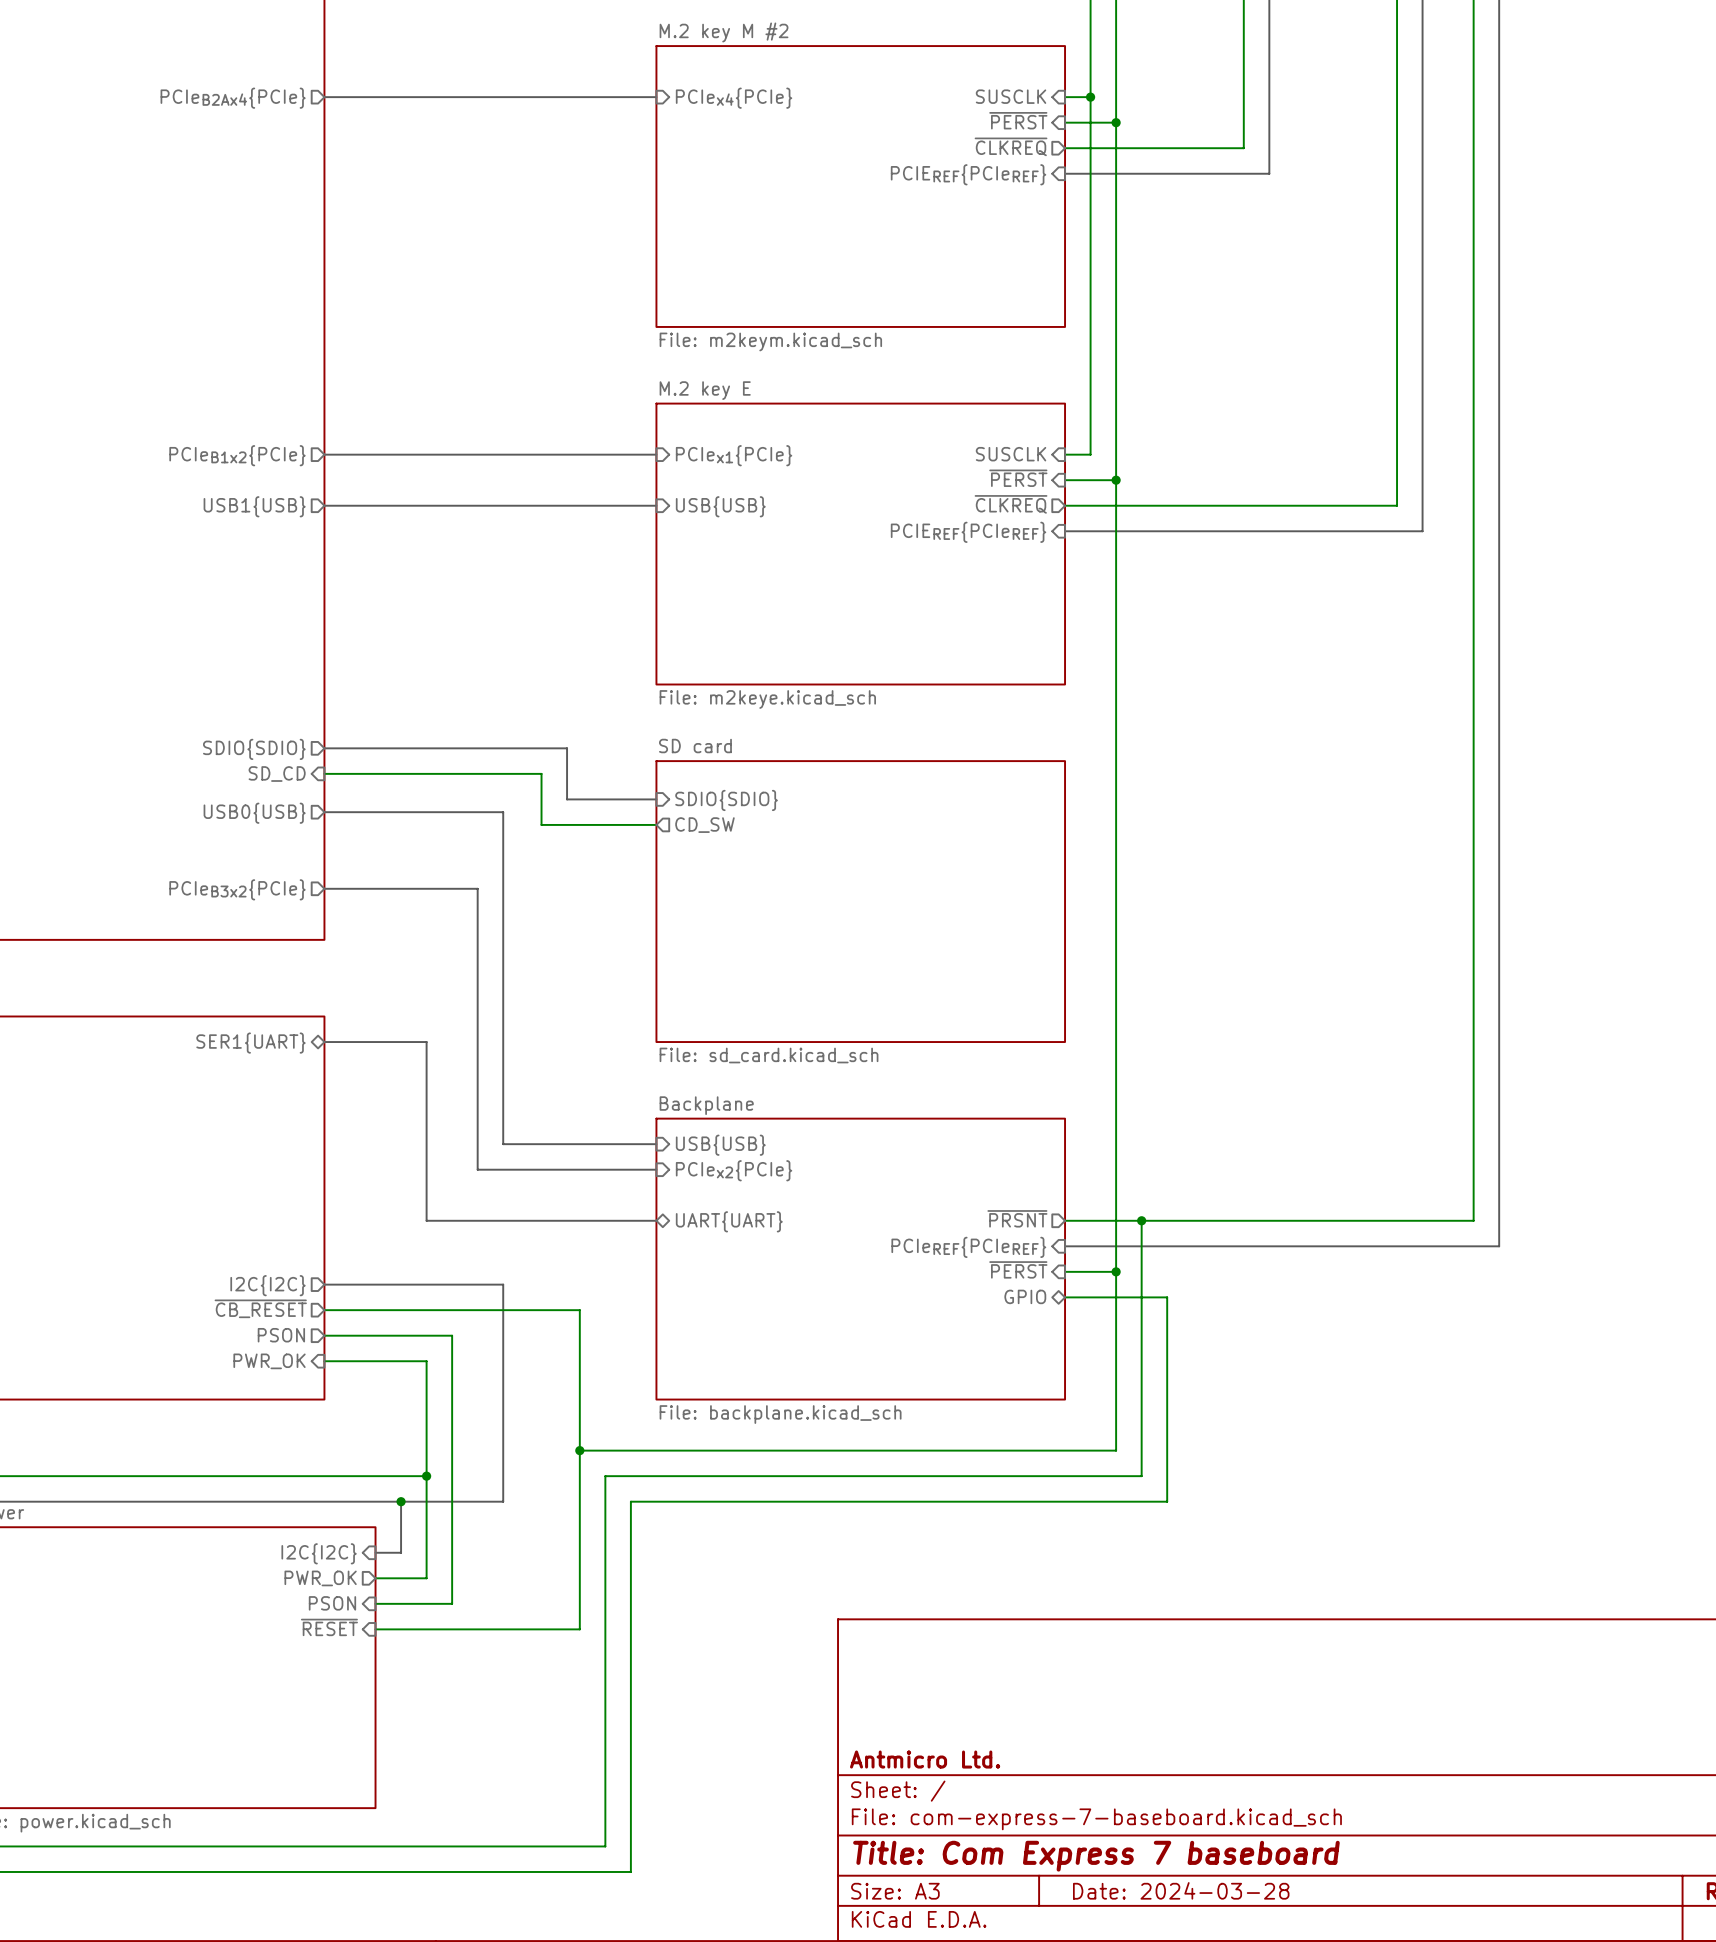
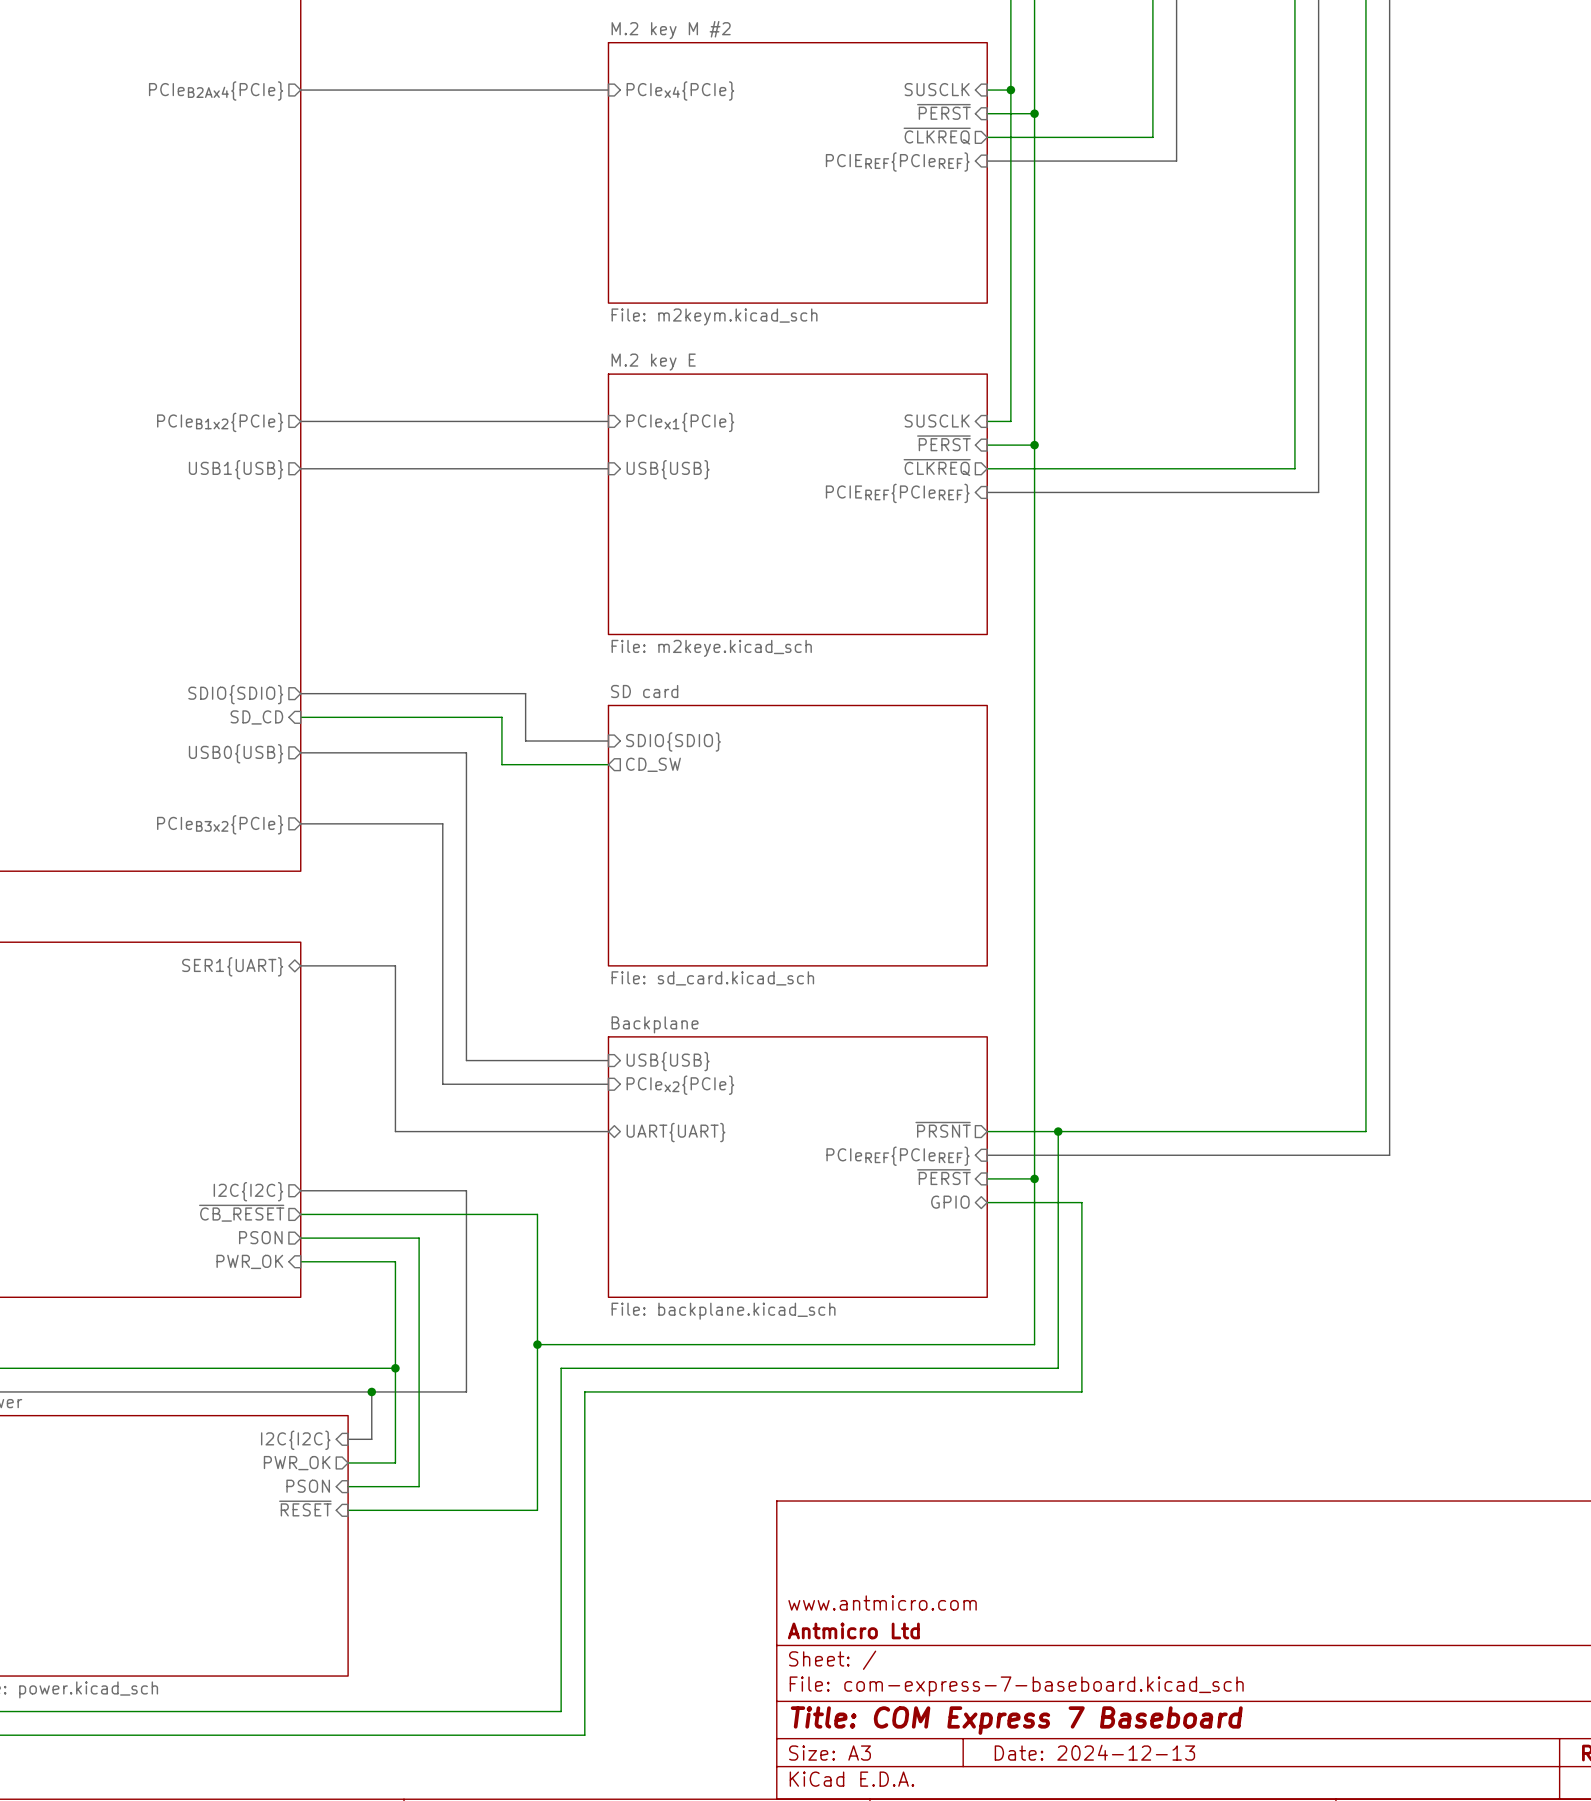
title block: none -> www.antmicro.com (882, 1603)
title block: Antmicro Ltd. (925, 1759) -> Antmicro Ltd (853, 1630)
title block: Title: Com Express 7 baseboard (1096, 1856) -> Title: COM Express 7 Baseboard (1016, 1720)
title block: Date: 2024-03-28 (1181, 1890) -> Date: 2024-12-13 (1094, 1752)

